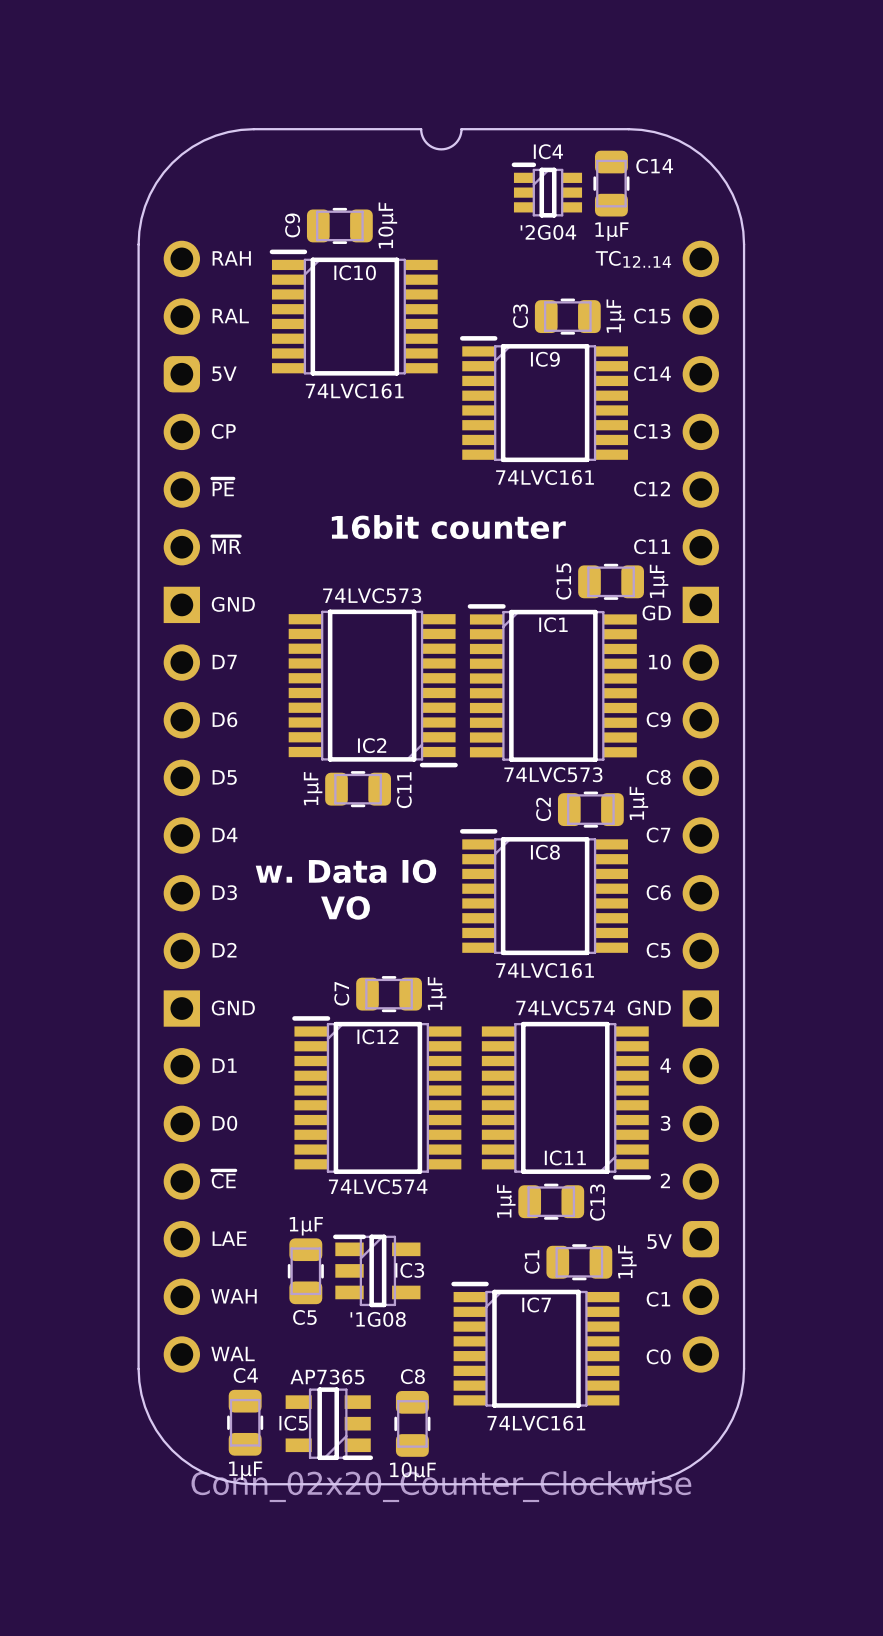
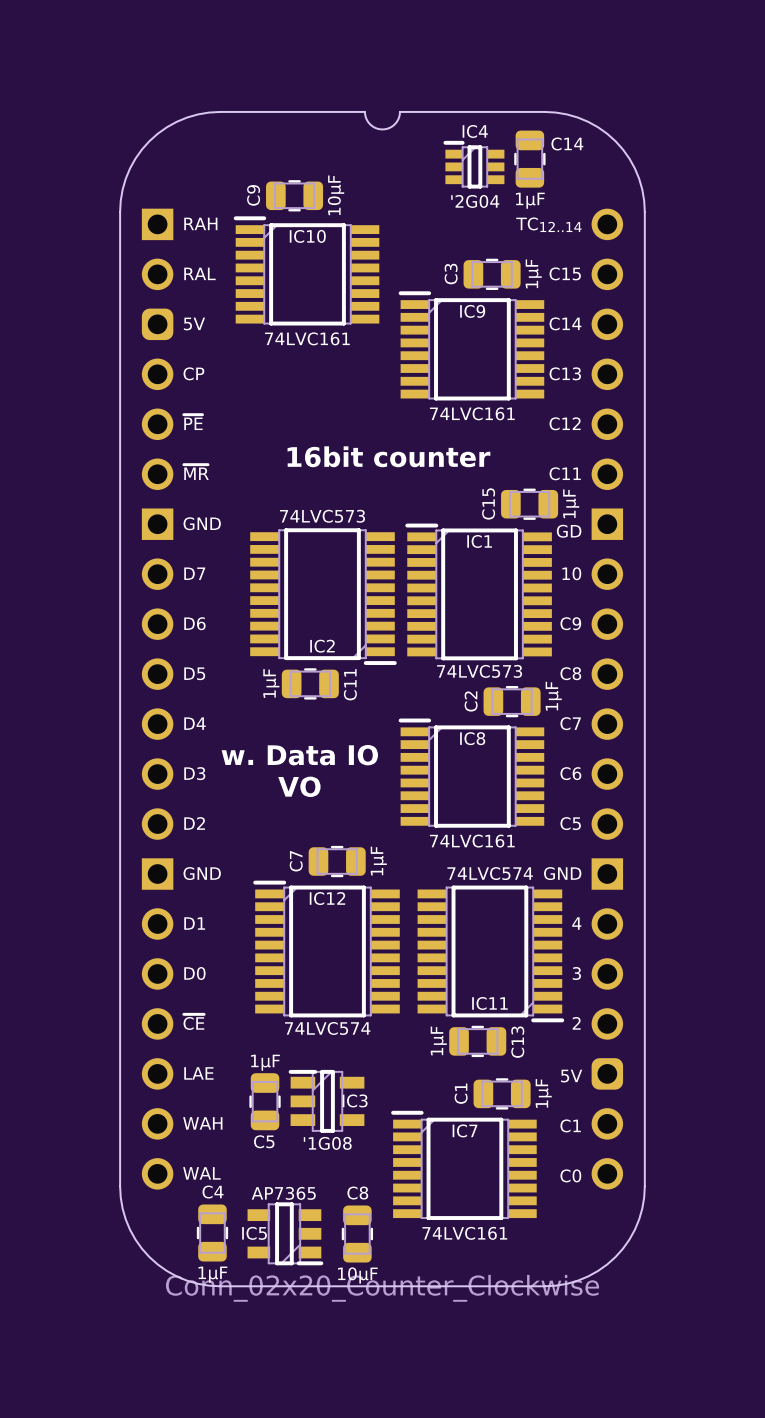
part footprint: [137, 128, 746, 1486] -> [119, 110, 646, 1288]

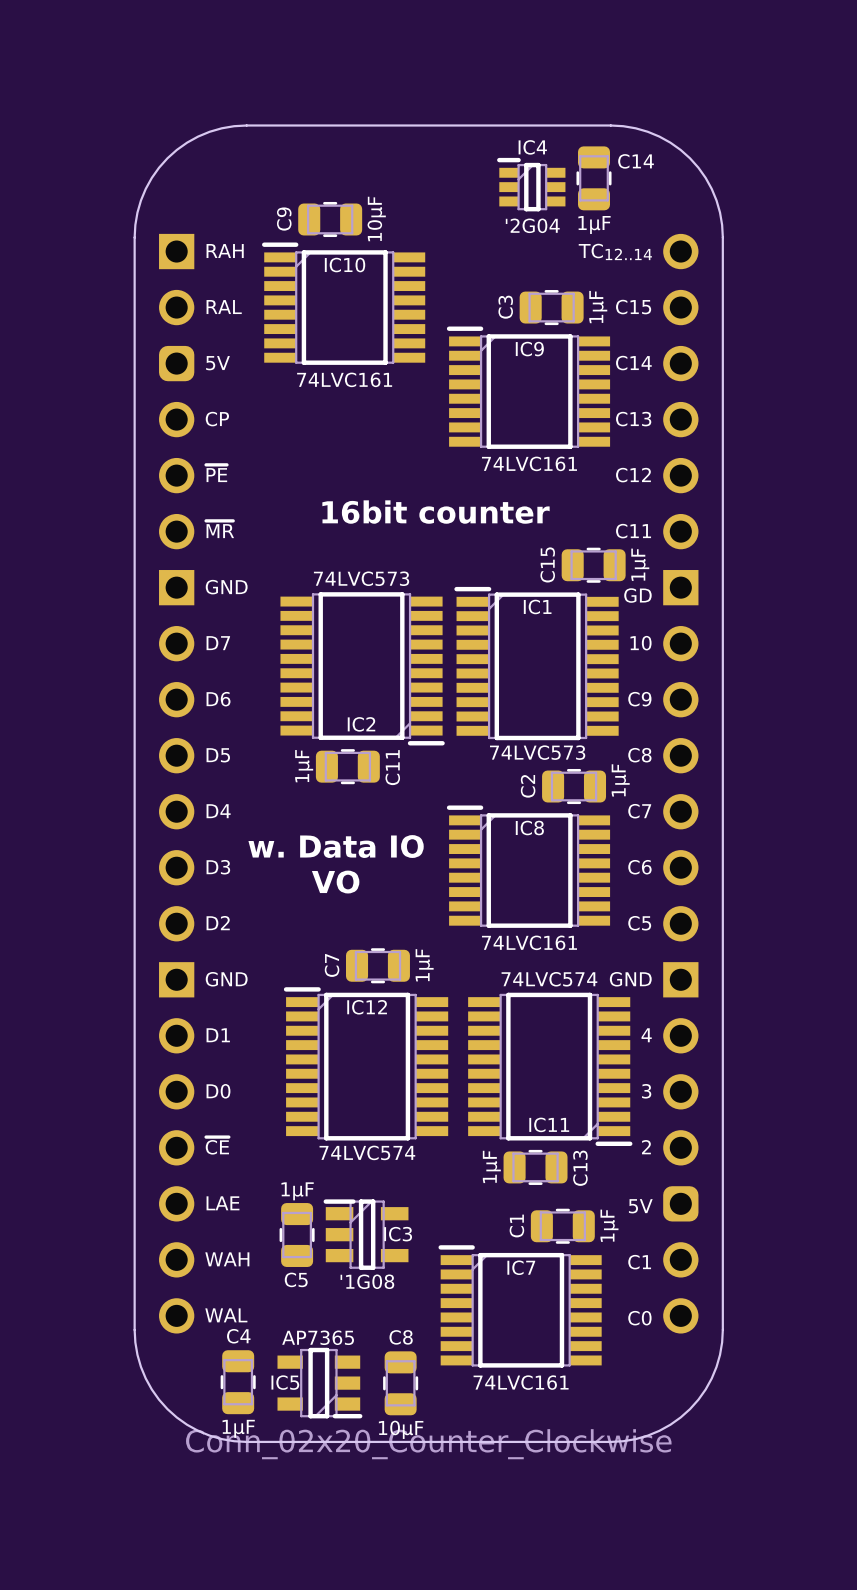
part footprint: [119, 110, 646, 1288] -> [133, 124, 724, 1444]

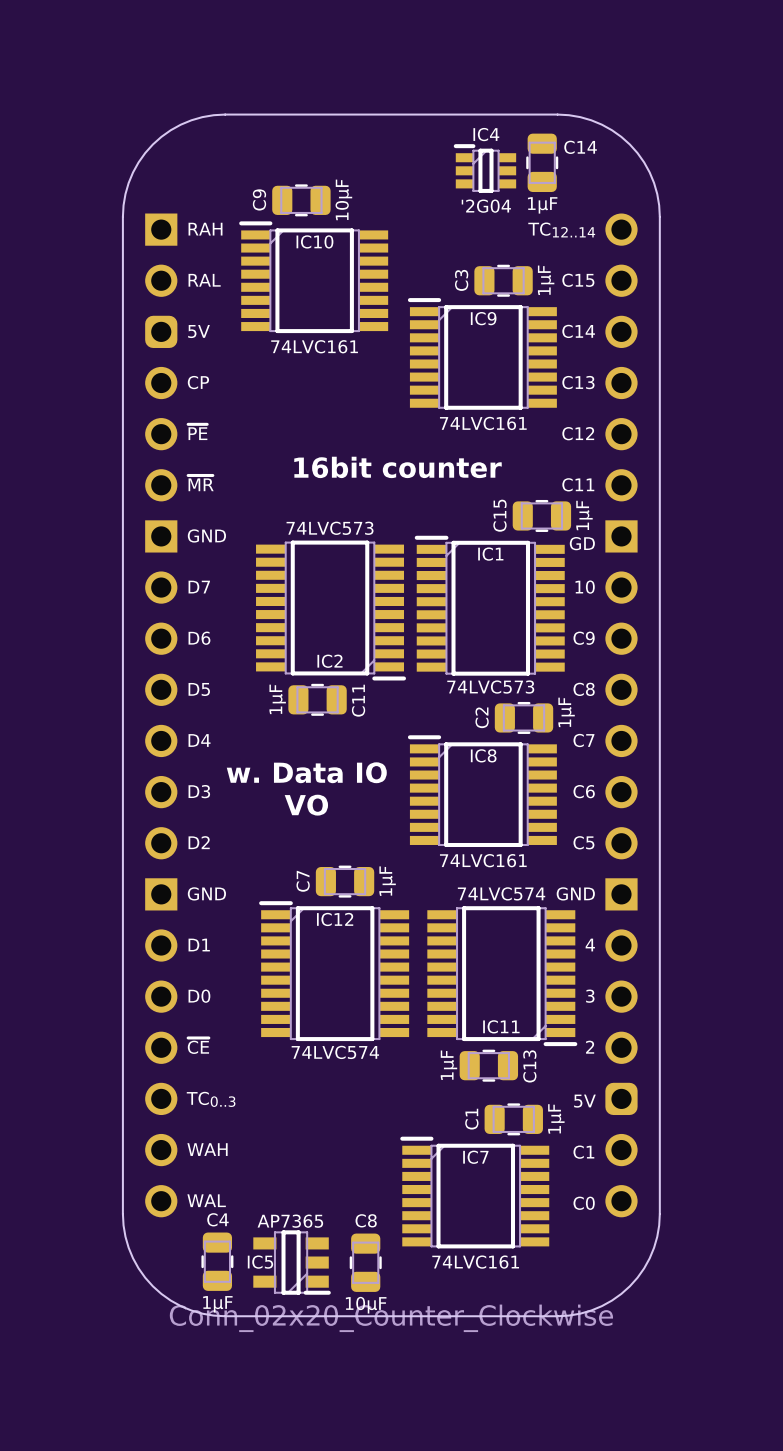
text: LAE (222, 1203) -> TC0..3 (211, 1099)
IC3: (366, 1234) -> none
C5: 1μF (297, 1235) -> none

